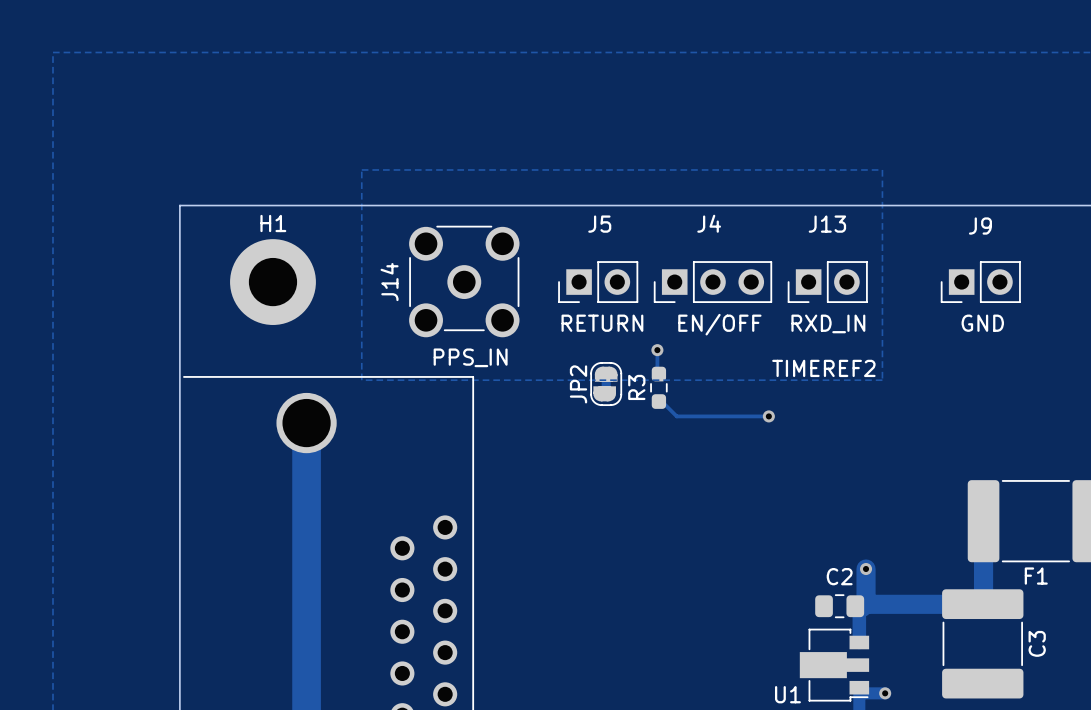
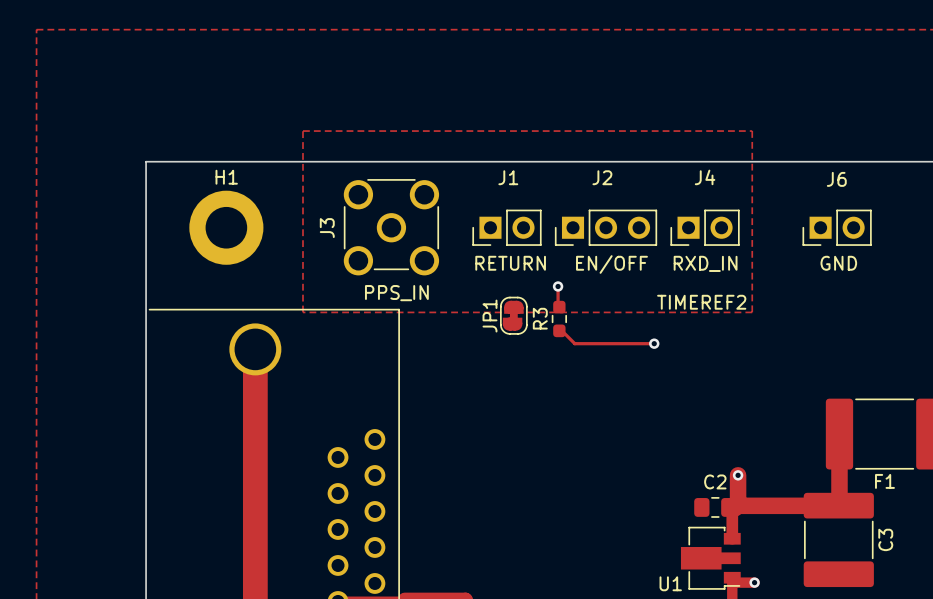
J4 name: J4 (709, 223) -> J2 (602, 177)
J5 name: J5 (599, 224) -> J1 (508, 177)
J13 name: J13 (827, 224) -> J4 (705, 177)
J9 name: J9 (980, 226) -> J6 (836, 179)
J14 name: J14 (389, 282) -> J3 (327, 228)
JP2 name: JP2 (578, 384) -> JP1 (489, 316)

